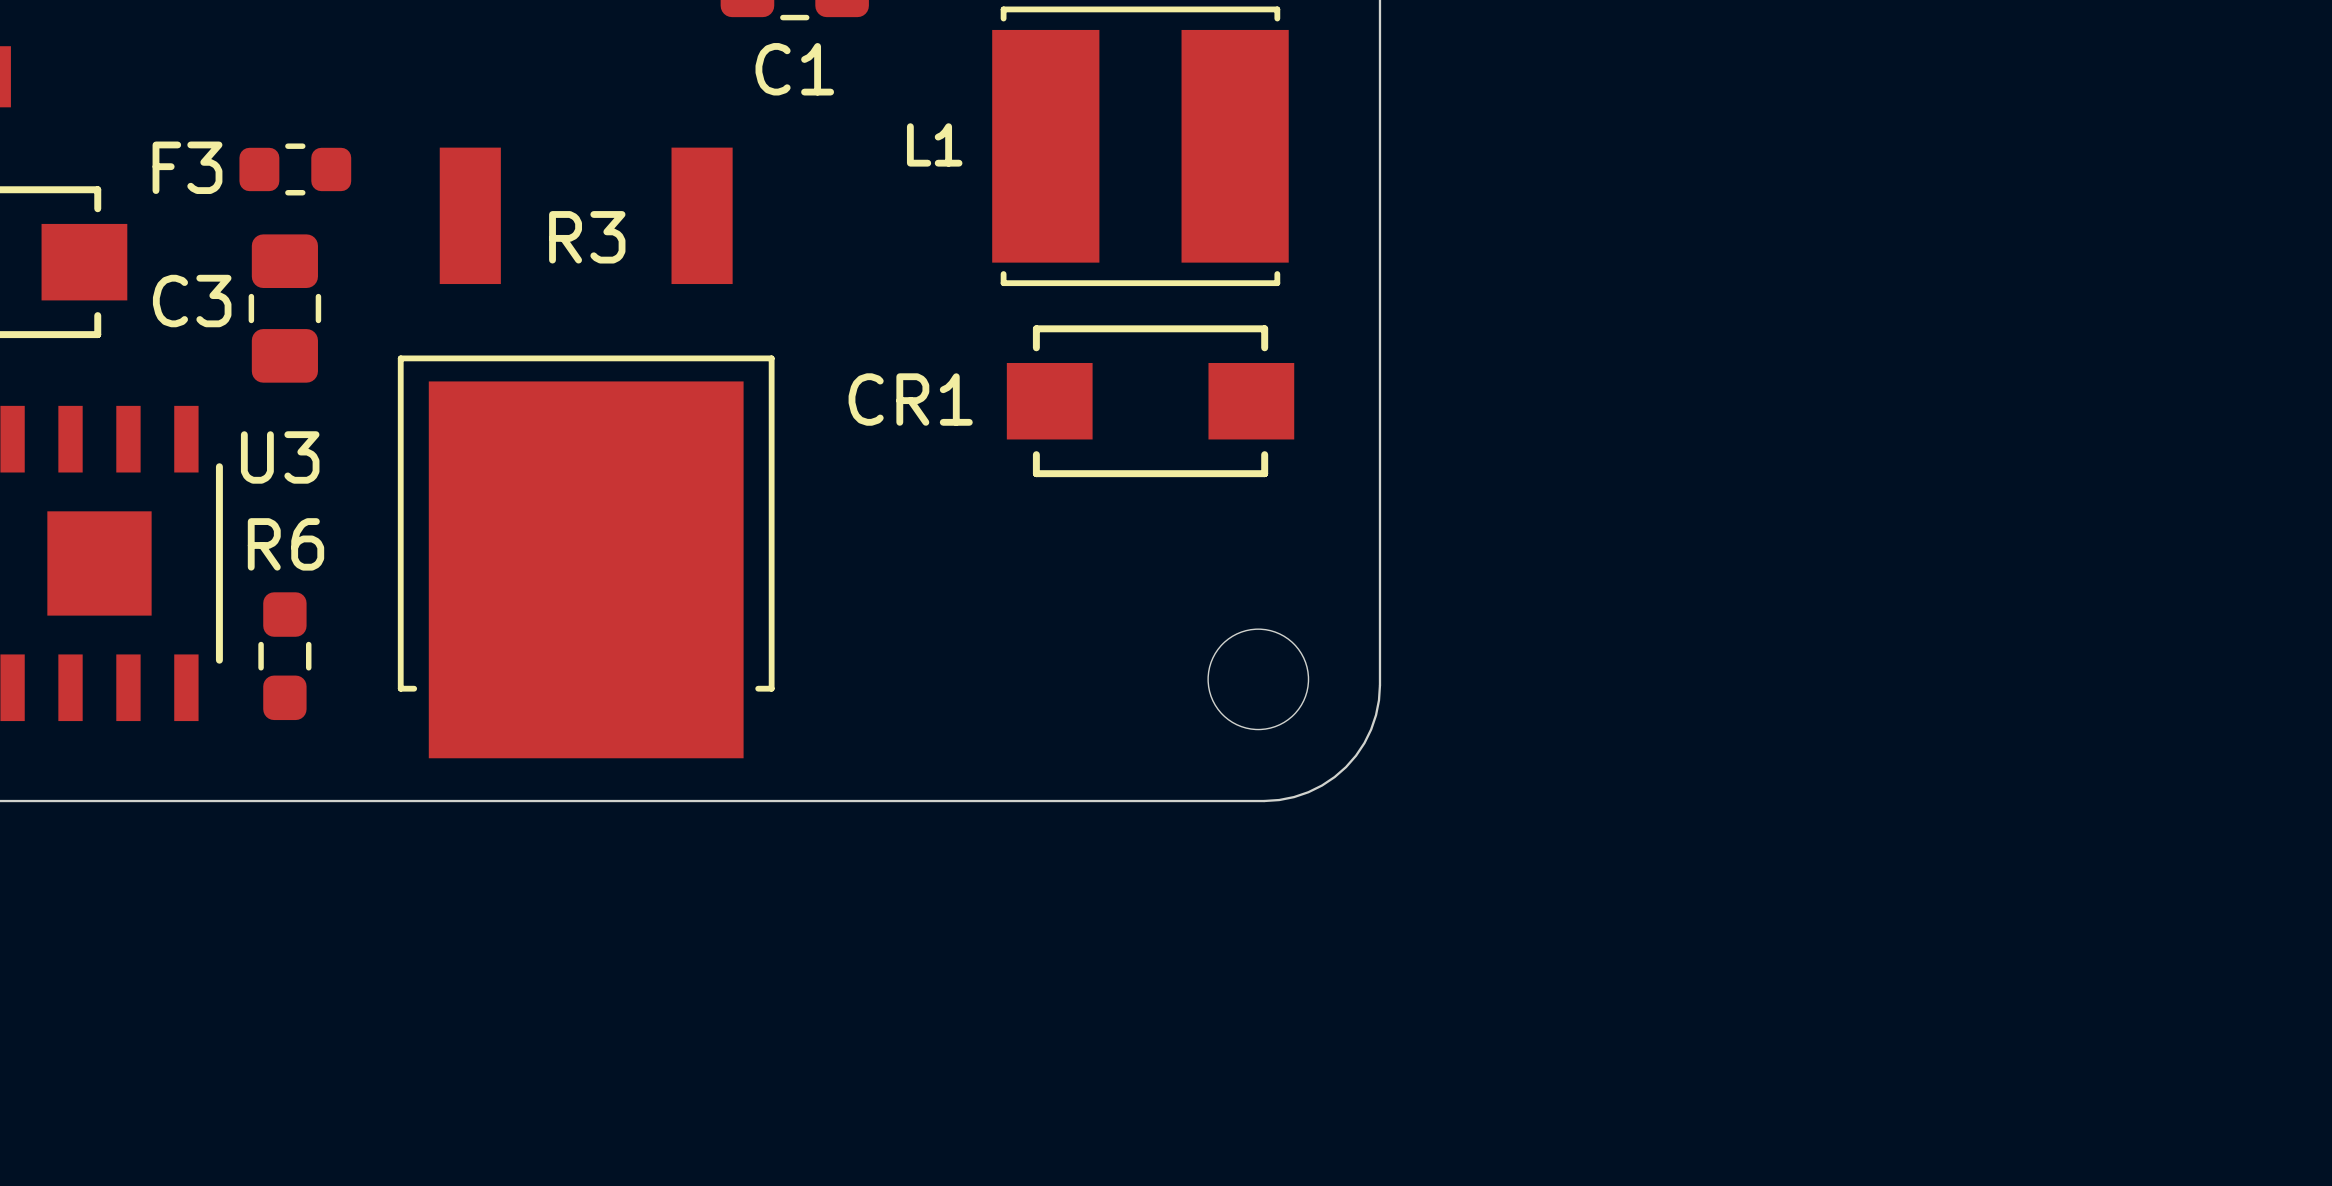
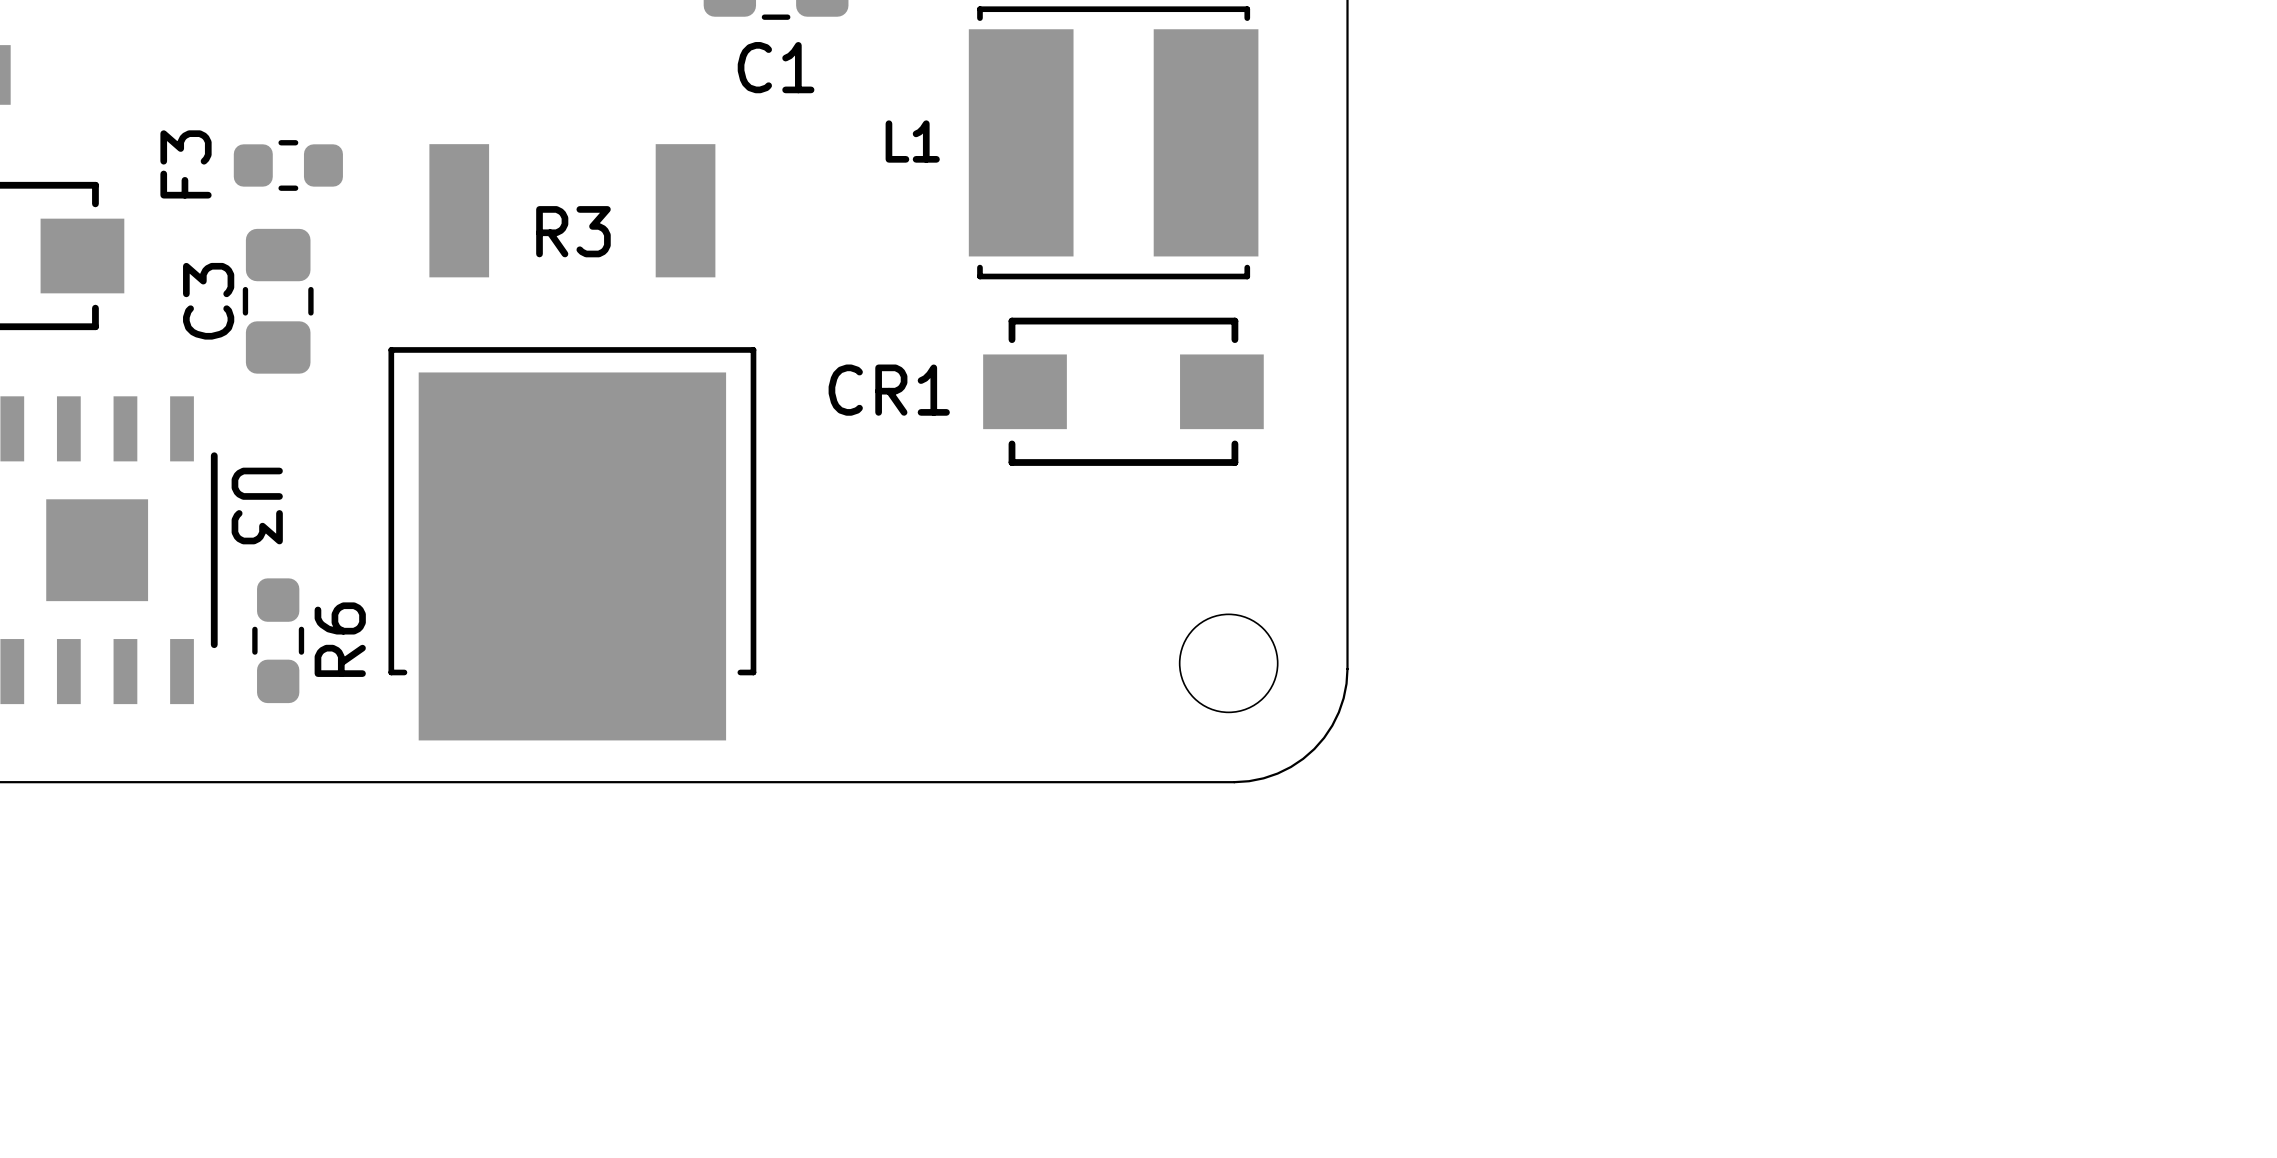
F3 name rotation: 0° (187, 167) -> 90° counterclockwise (186, 164)
C3 name rotation: 0° (192, 301) -> 90° counterclockwise (208, 301)
U3 name rotation: 0° (280, 457) -> 90° clockwise (257, 506)
R6 name rotation: 0° (285, 544) -> 90° counterclockwise (340, 639)
R6 name position: R6 (285, 544) -> R6 (340, 639)

